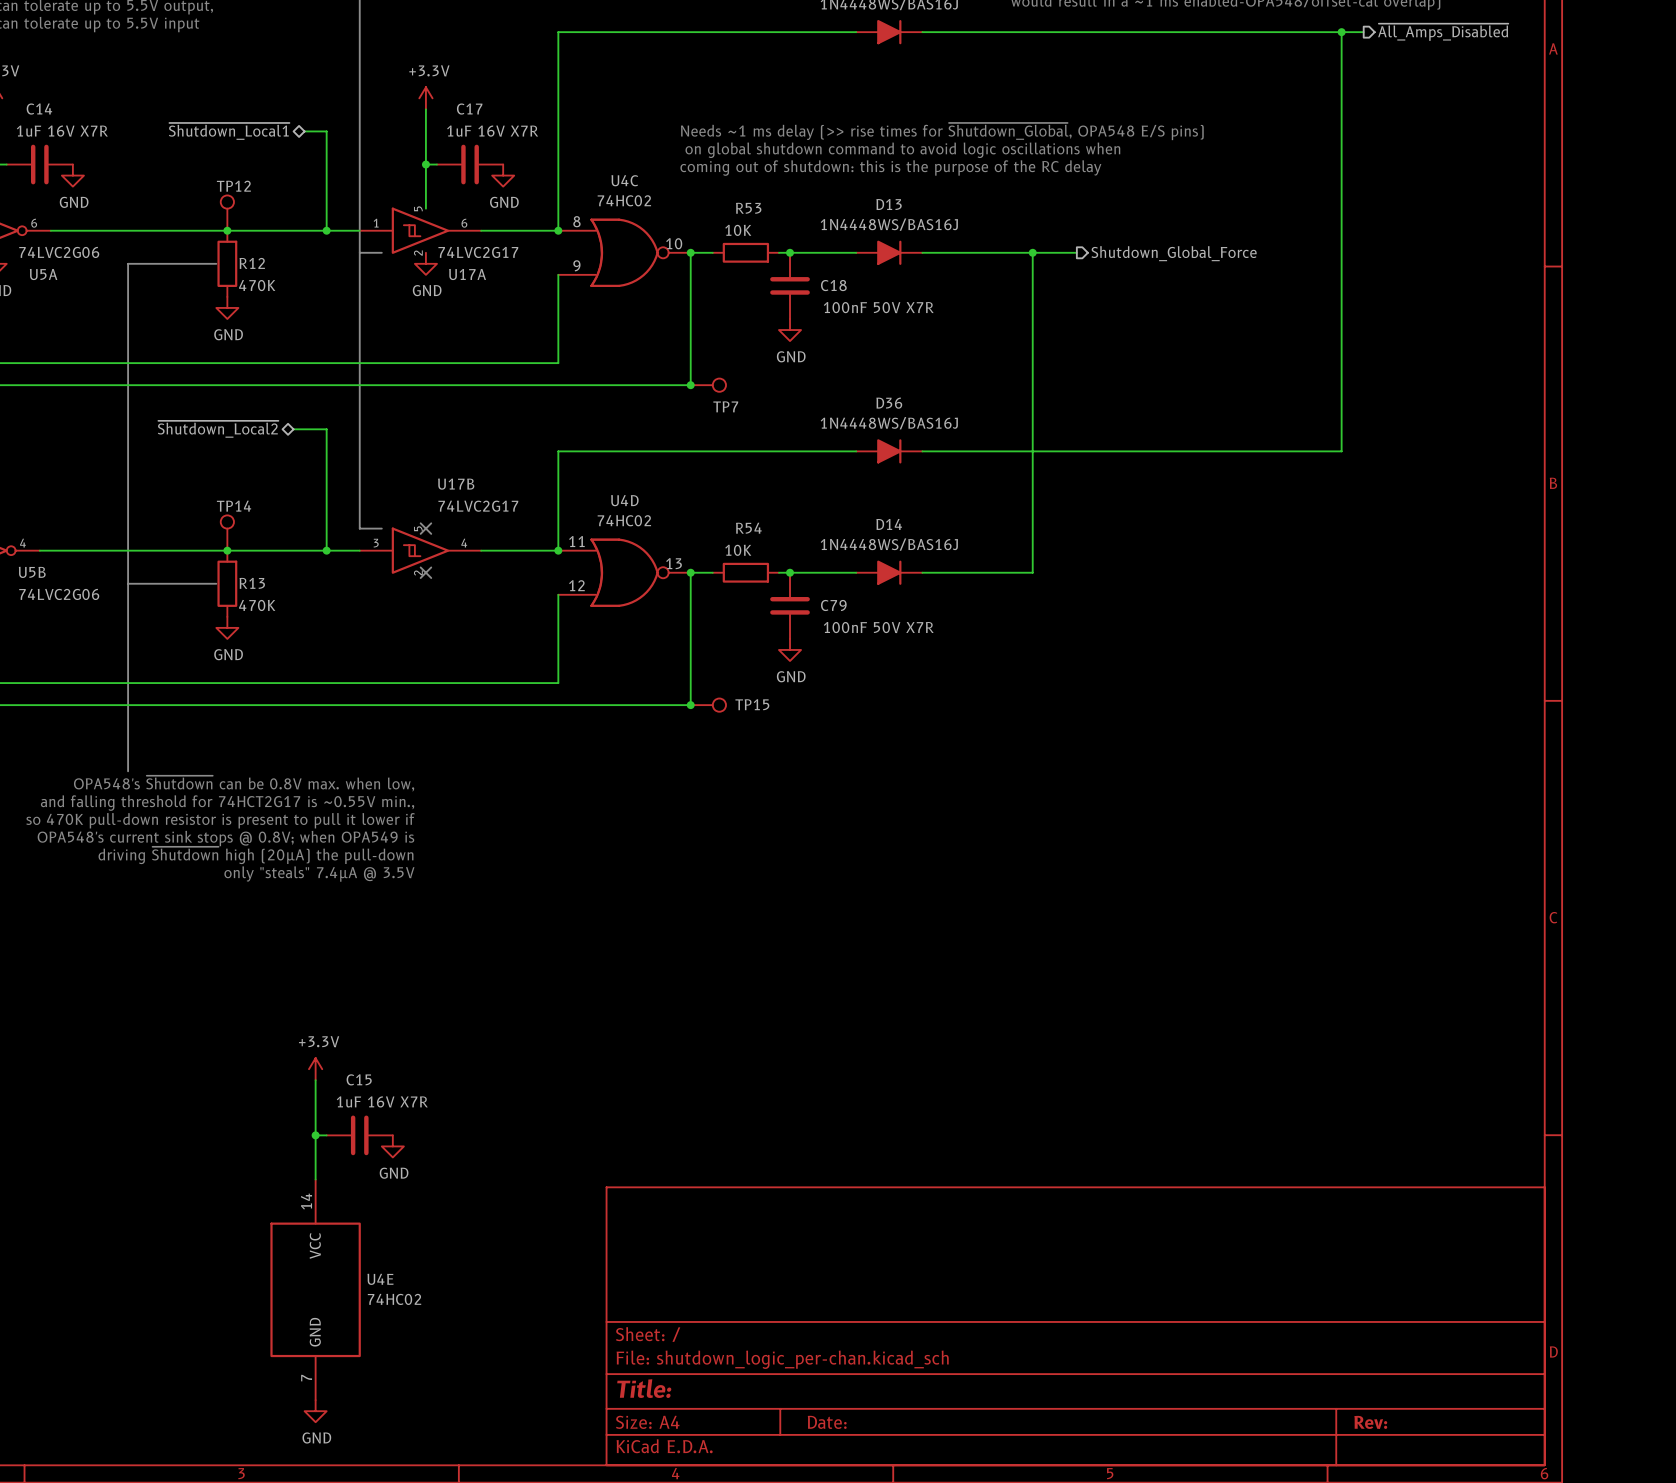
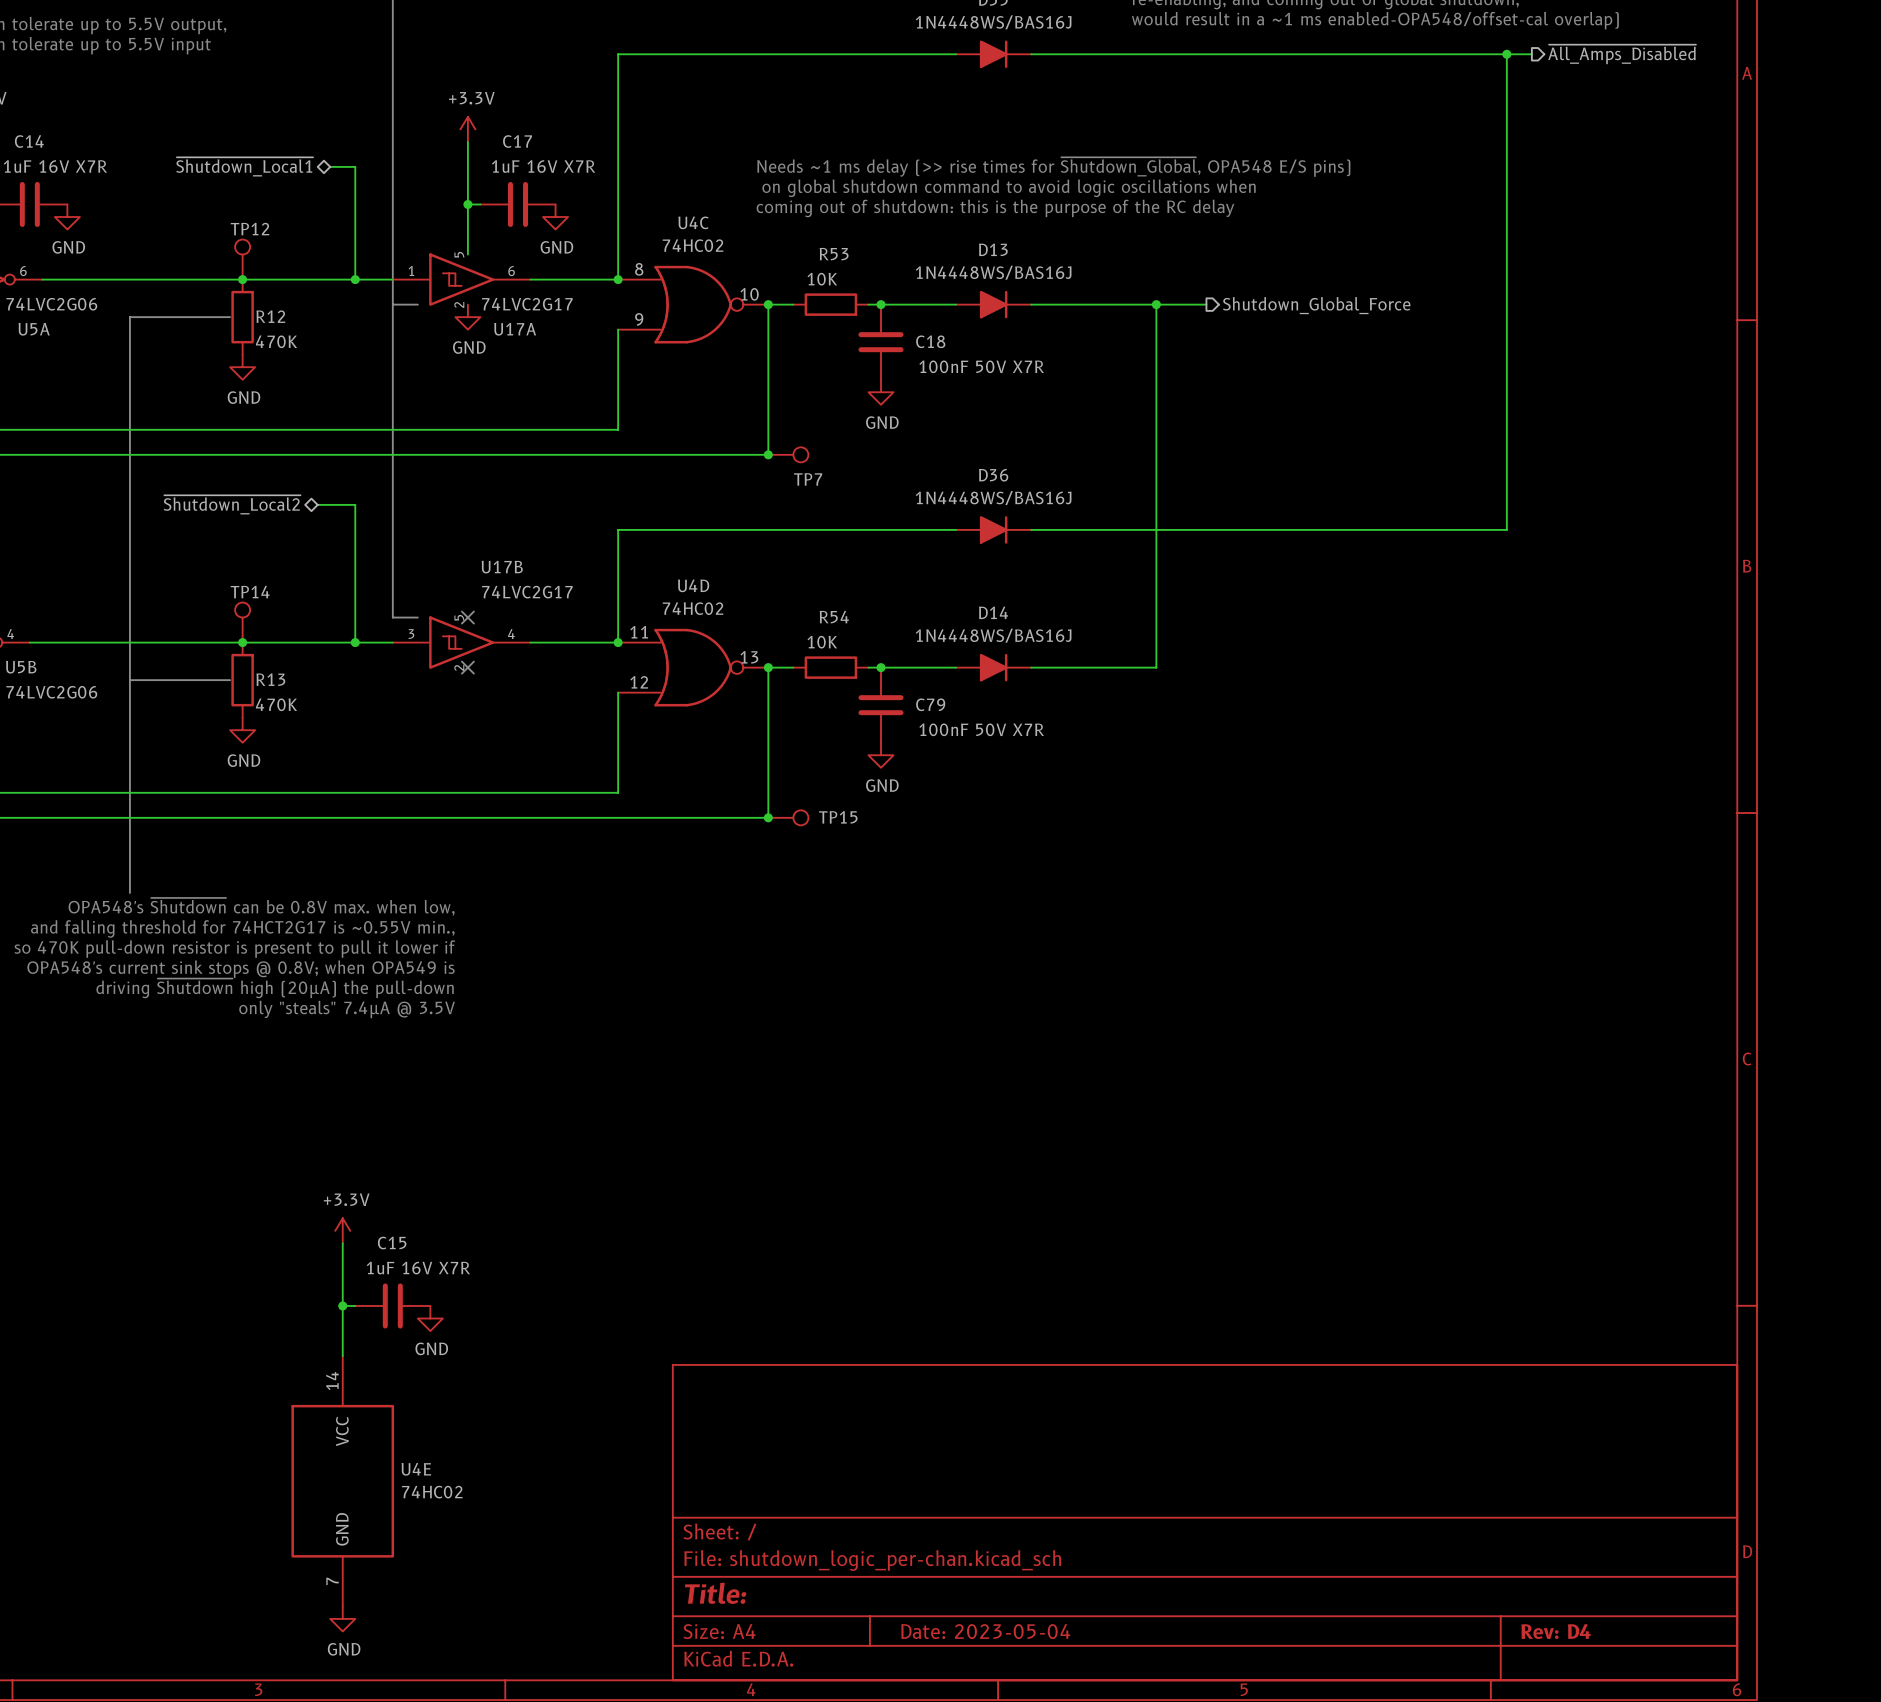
title block: Date: (827, 1422) -> Date: 2023-05-04 (985, 1631)
title block: Rev: (1370, 1422) -> Rev: D4 (1556, 1631)

